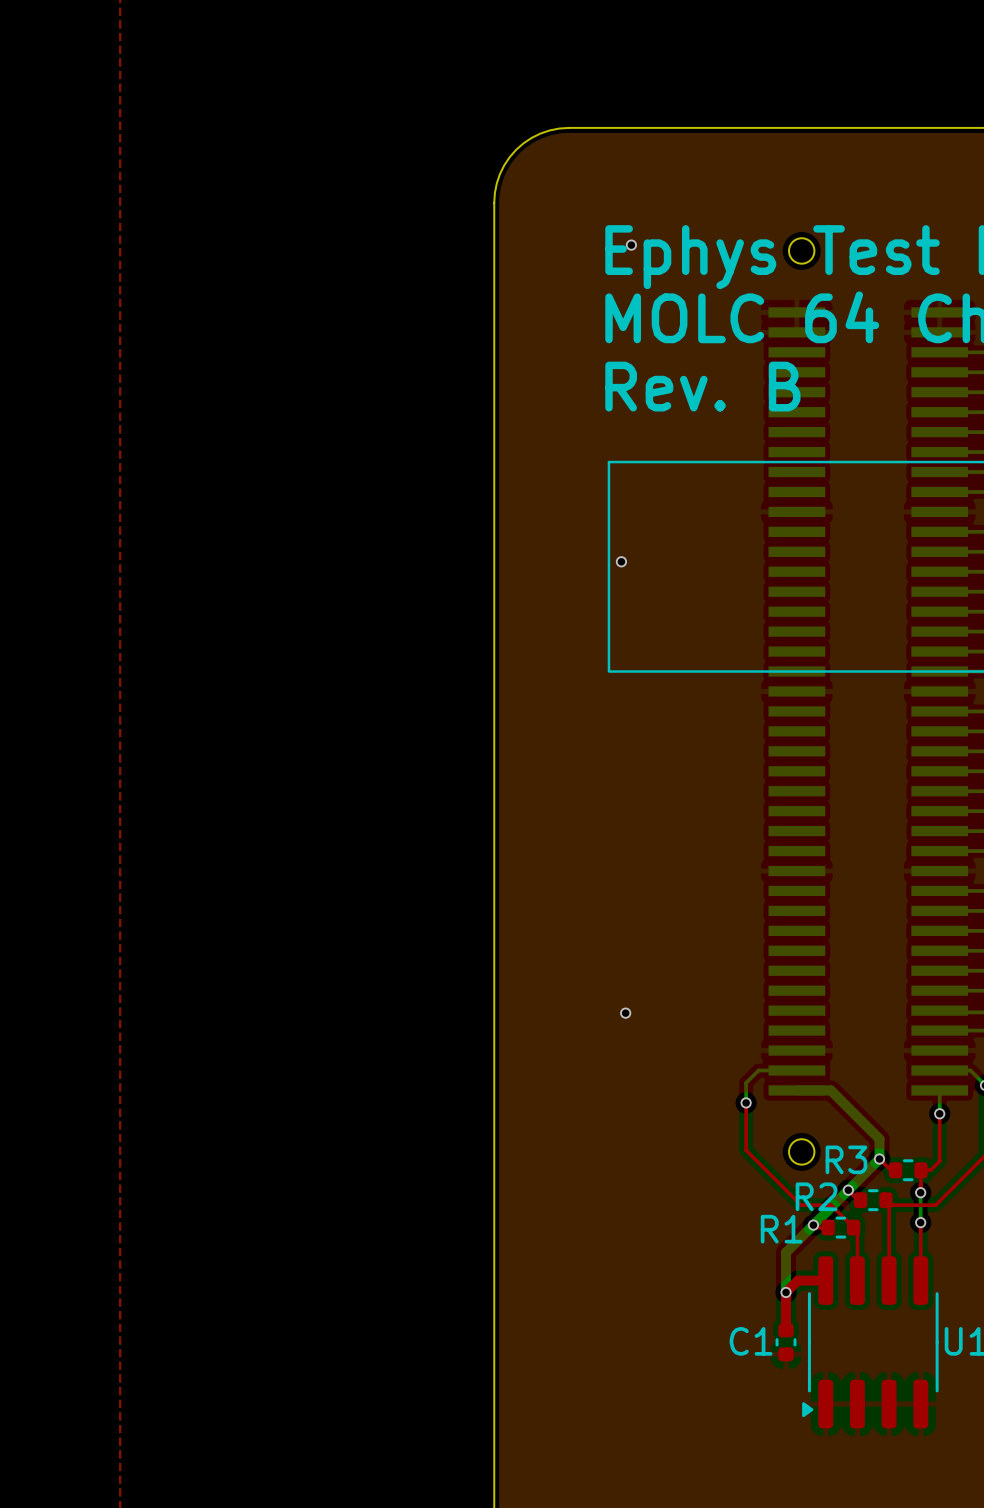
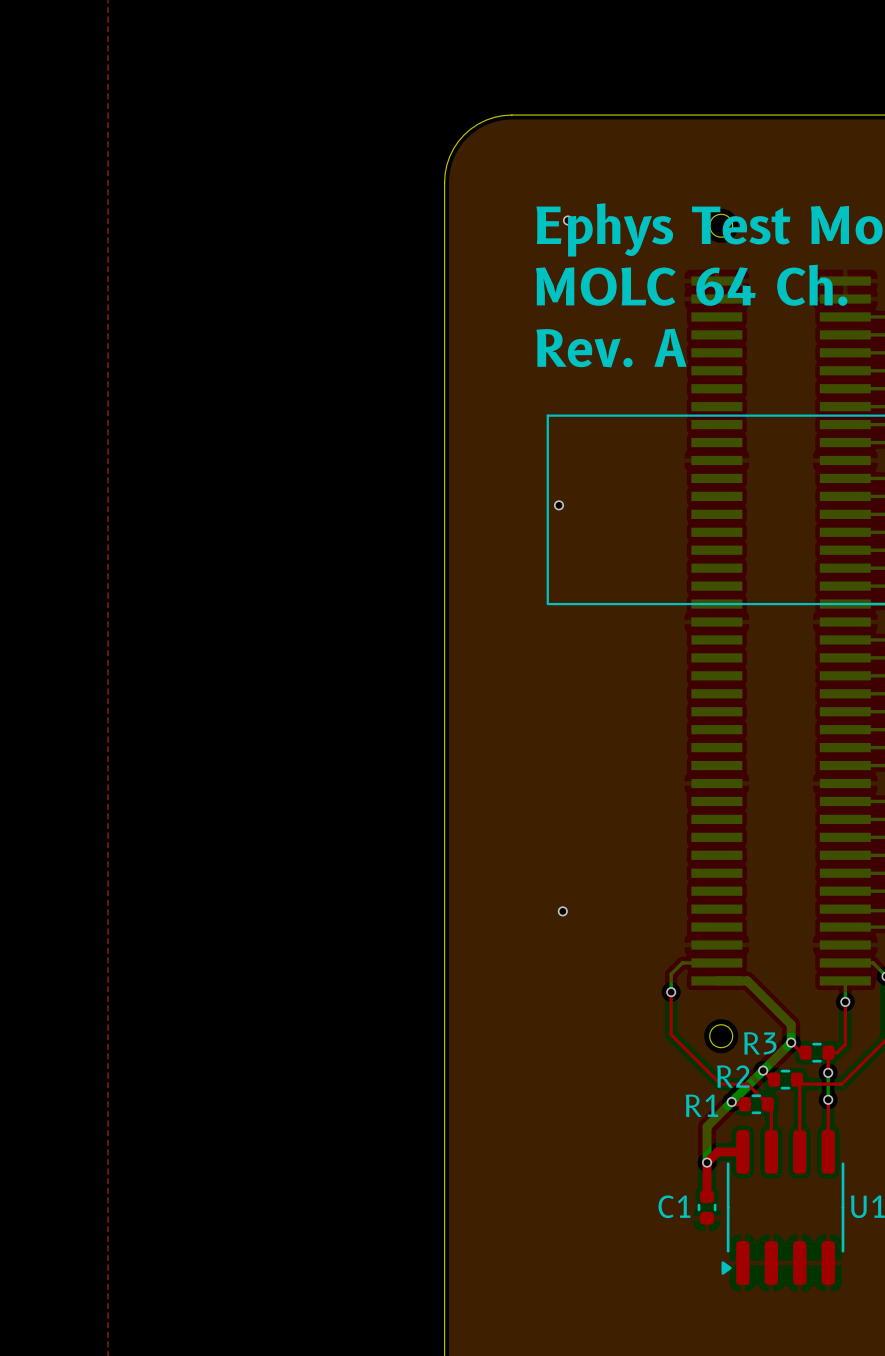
text: Rev. B (702, 386) -> Rev. A (611, 348)

